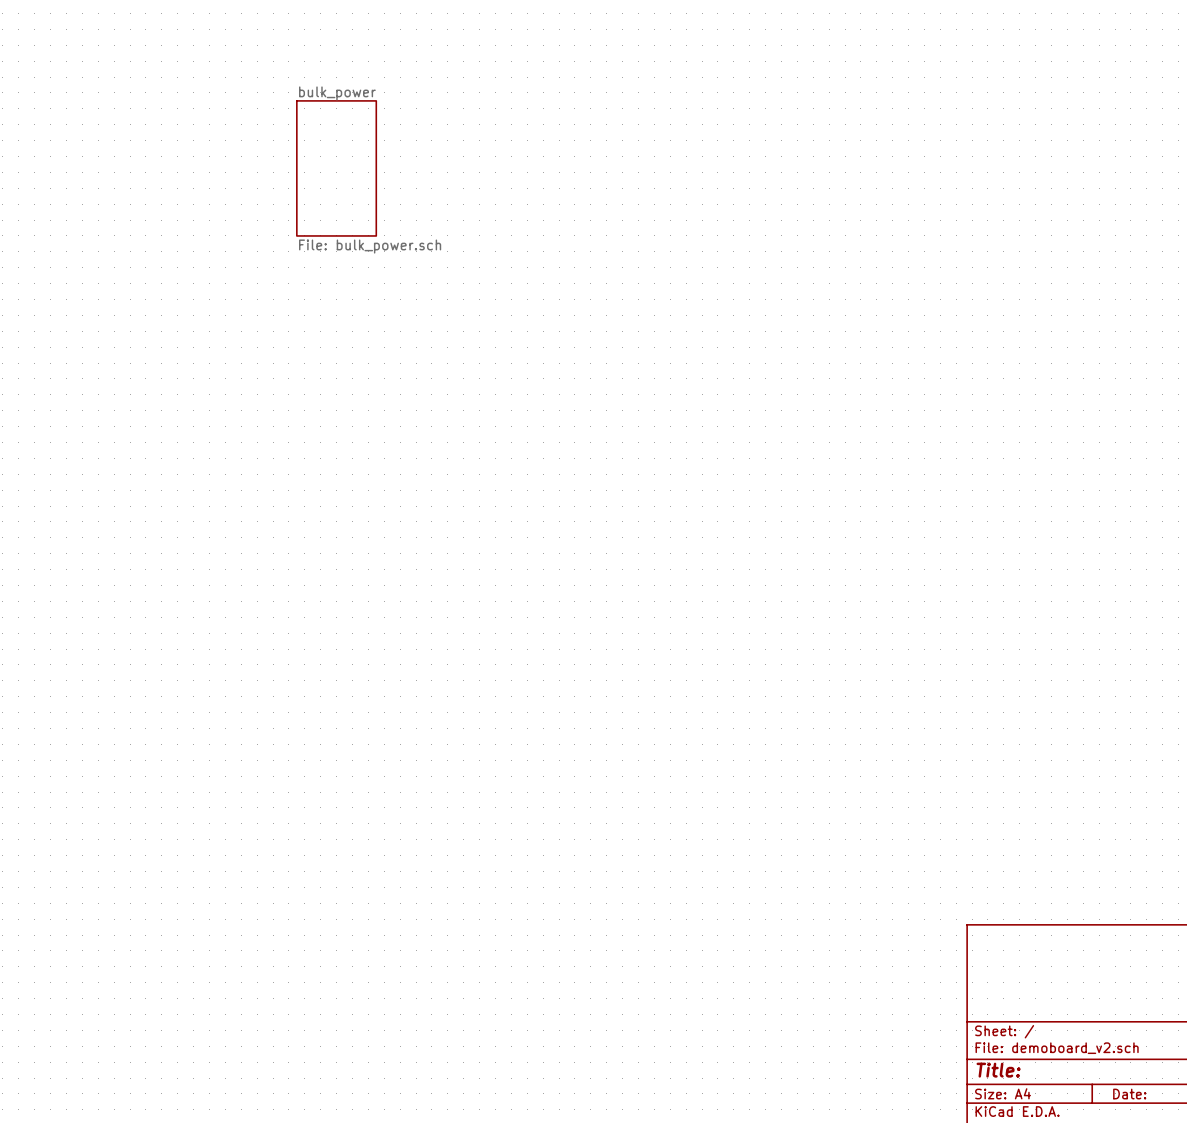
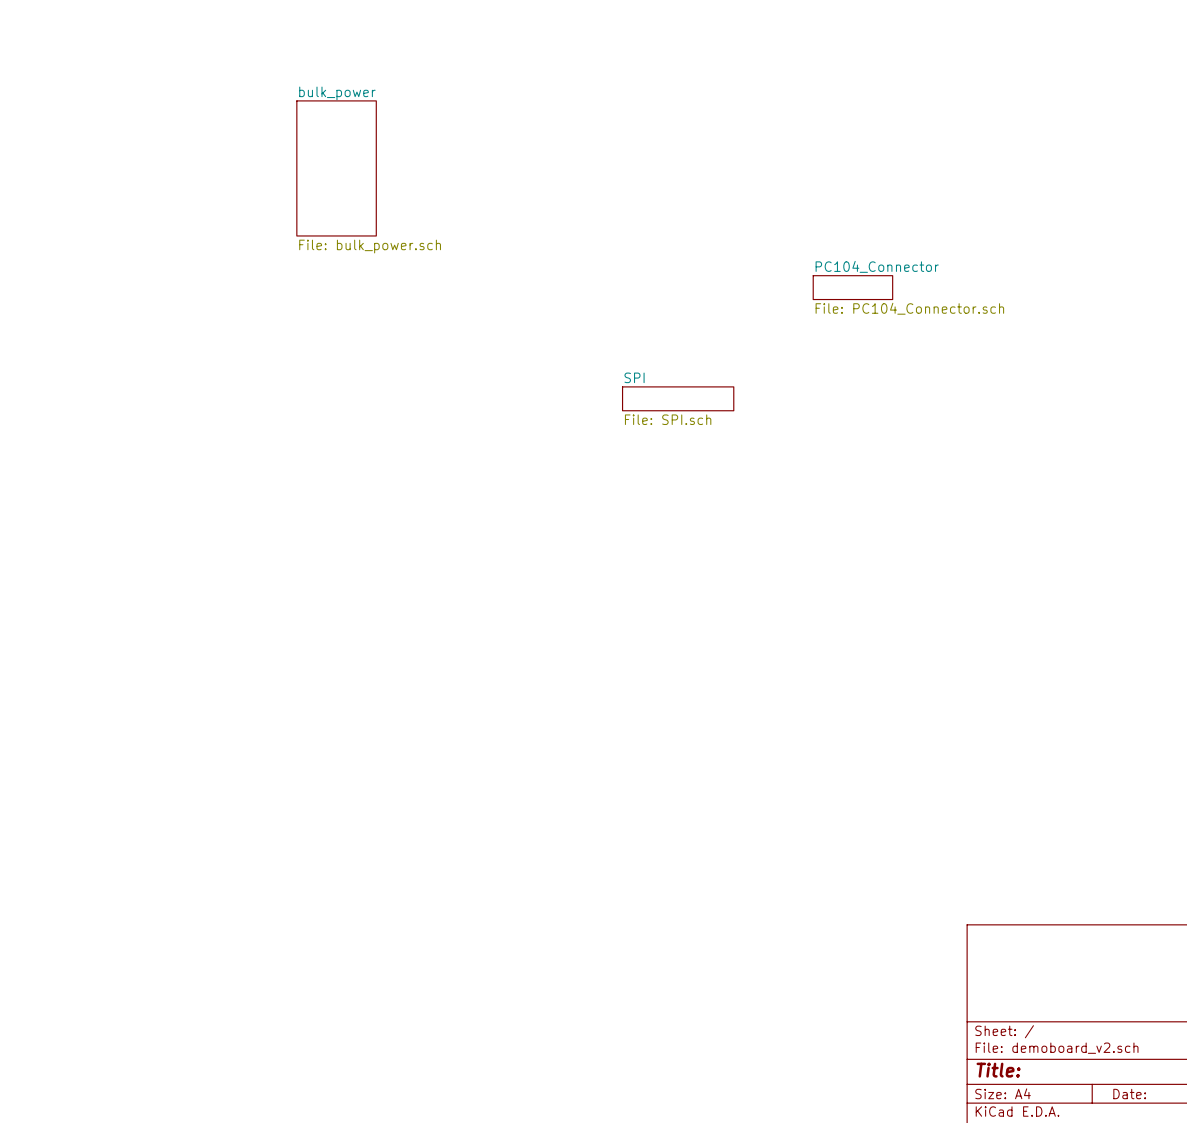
sheet PC104_Connector: none -> File: PC104_Connector.sch (852, 287)
sheet SPI: none -> File: SPI.sch (678, 398)

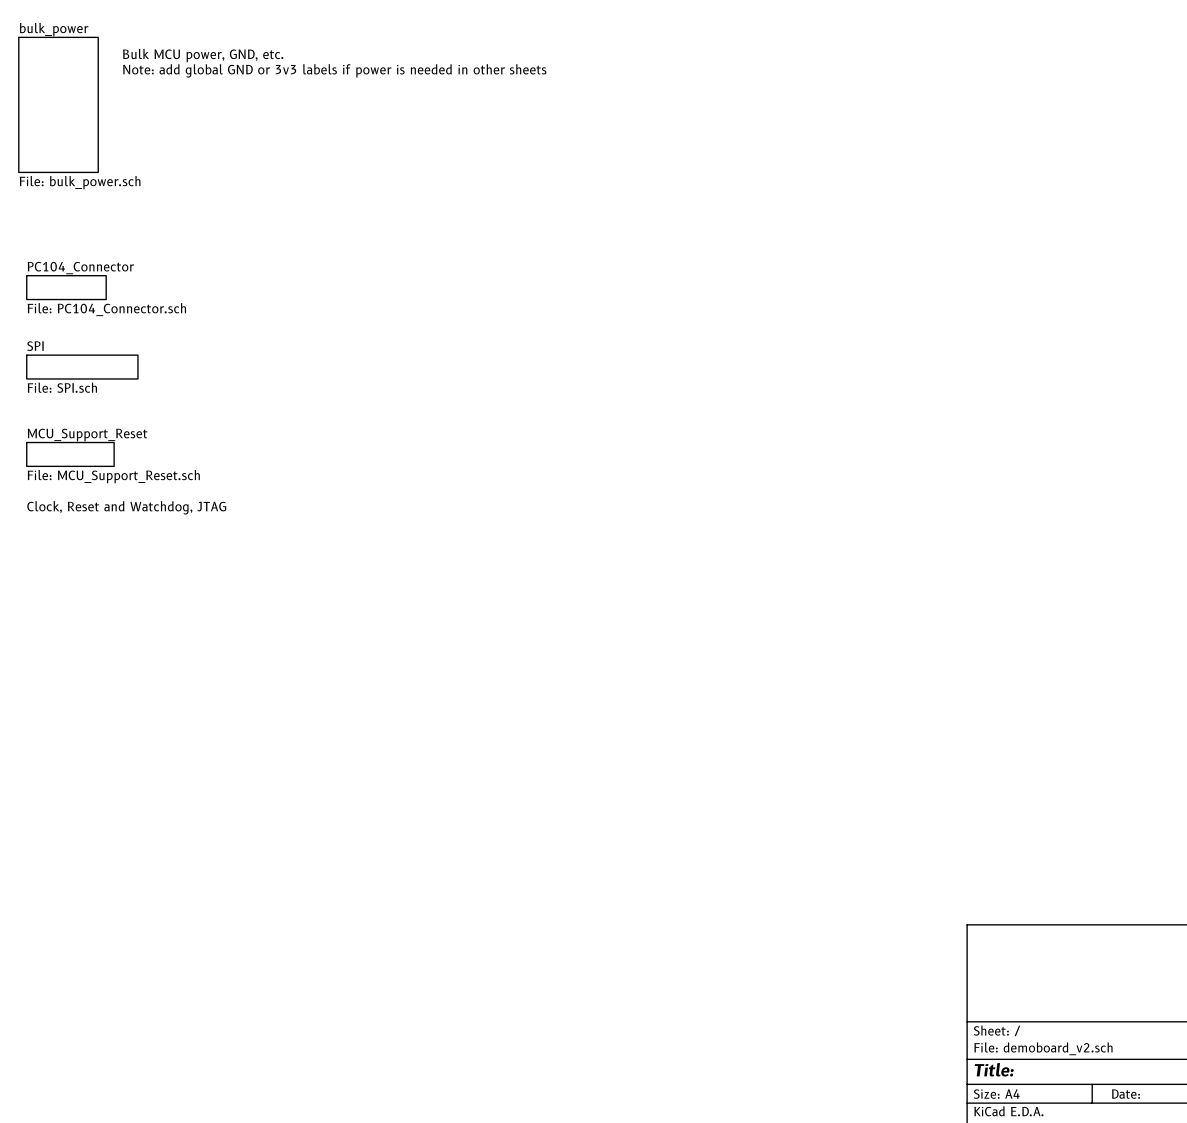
text: none -> Bulk MCU power, GND, etc. (203, 55)
text: none -> Note: add global GND or 3v3 labels if power is needed in other sheets (334, 70)
sheet bulk_power: none -> File: bulk_power.sch (58, 104)
sheet bulk_power: File: bulk_power.sch (336, 168) -> none
sheet PC104_Connector position: (852, 287) -> (66, 287)
sheet SPI: none -> File: SPI.sch (82, 367)
sheet SPI: File: SPI.sch (678, 398) -> none
sheet MCU_Support_Reset: none -> File: MCU_Support_Reset.sch (70, 454)
text: none -> Clock, Reset and Watchdog, JTAG (126, 507)

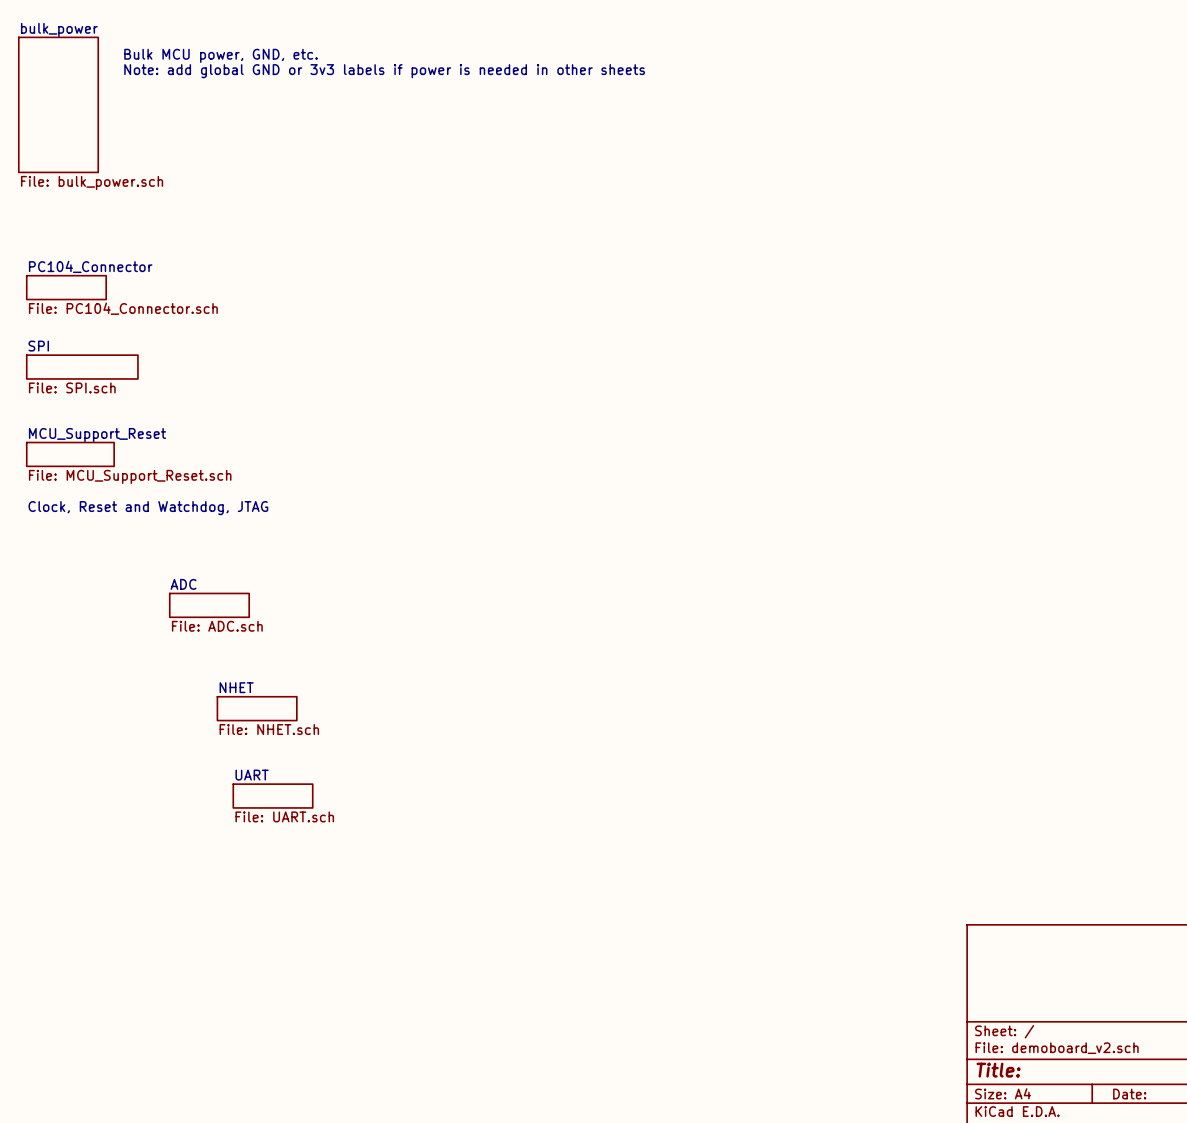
sheet ADC: none -> File: ADC.sch (209, 605)
sheet NHET: none -> File: NHET.sch (257, 708)
sheet UART: none -> File: UART.sch (273, 796)

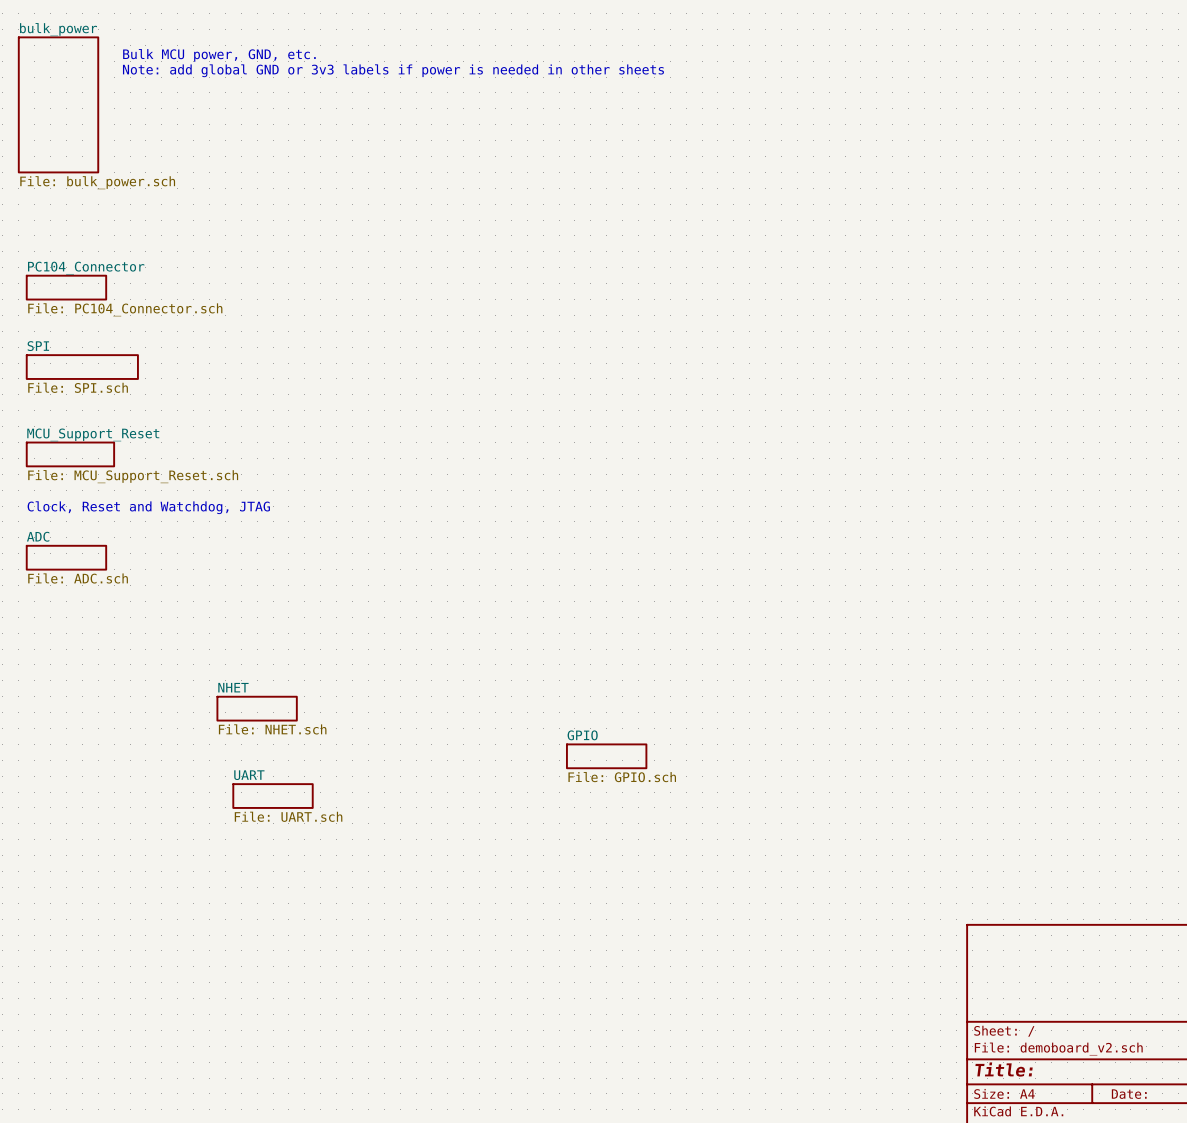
sheet ADC position: (209, 605) -> (66, 557)
sheet GPIO: none -> File: GPIO.sch (606, 756)

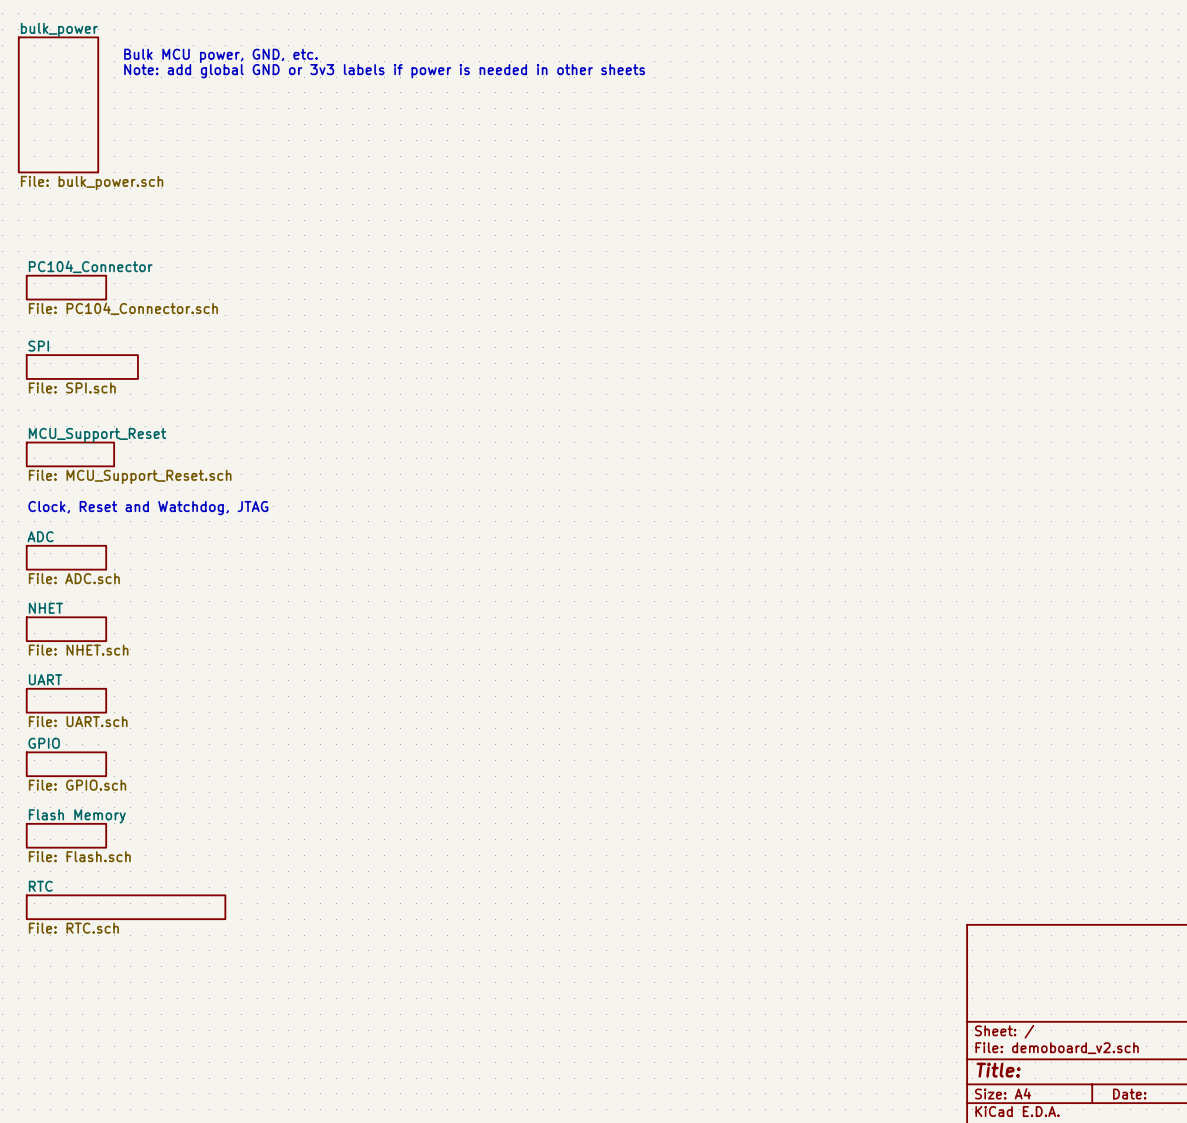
sheet NHET: none -> File: NHET.sch (66, 629)
sheet UART: none -> File: UART.sch (66, 700)
sheet NHET: File: NHET.sch (257, 708) -> none
sheet GPIO: File: GPIO.sch (606, 756) -> none
sheet GPIO: none -> File: GPIO.sch (66, 764)
sheet UART: File: UART.sch (273, 796) -> none
sheet Flash Memory: none -> File: Flash.sch (66, 835)
sheet RTC: none -> File: RTC.sch (126, 907)

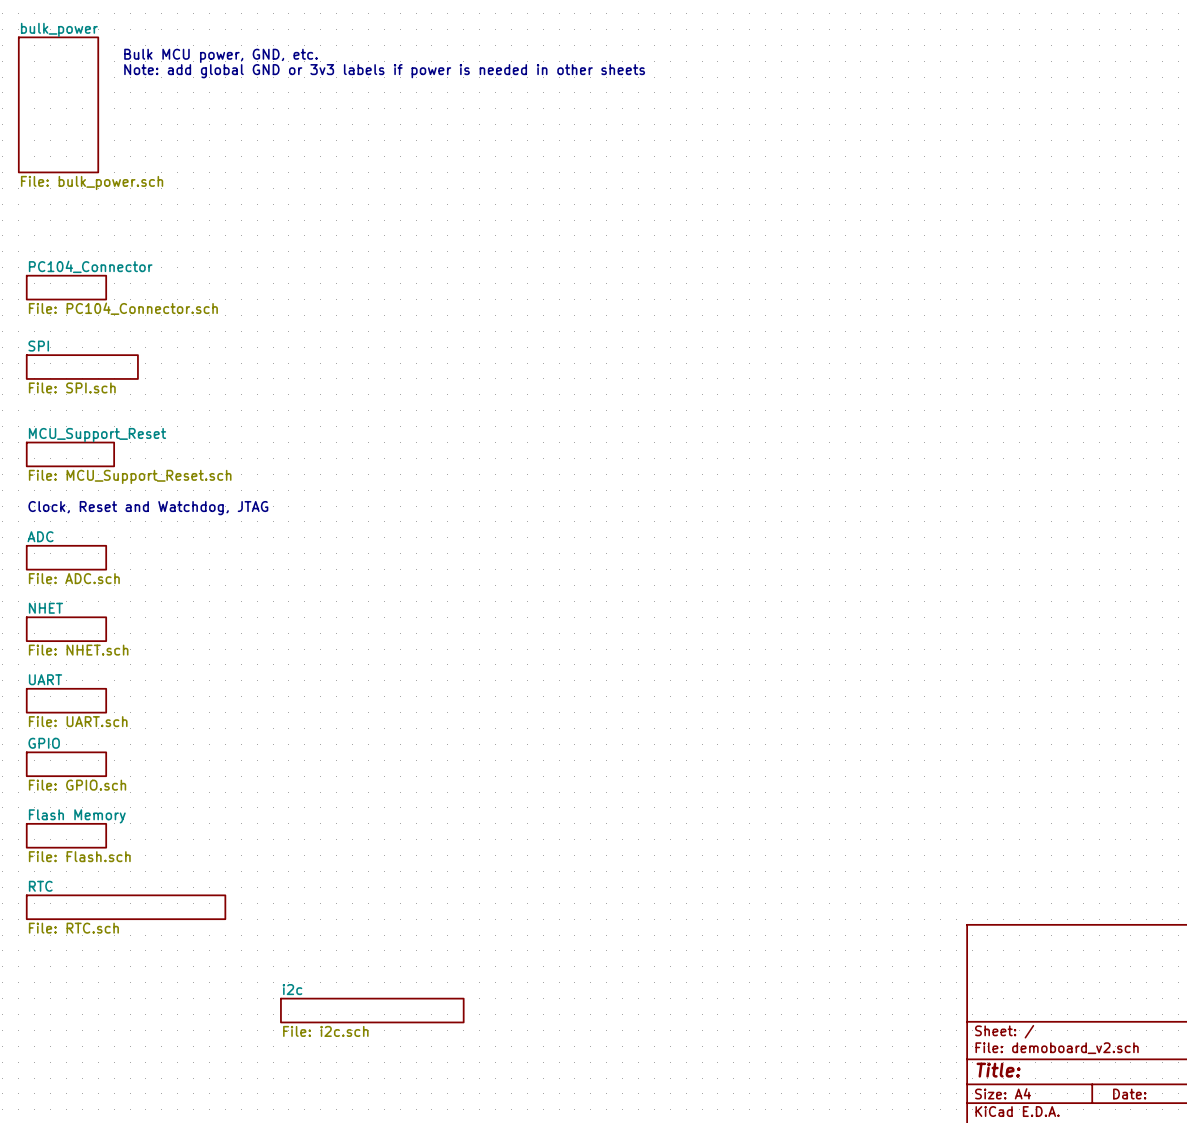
sheet i2c: none -> File: i2c.sch (372, 1010)

